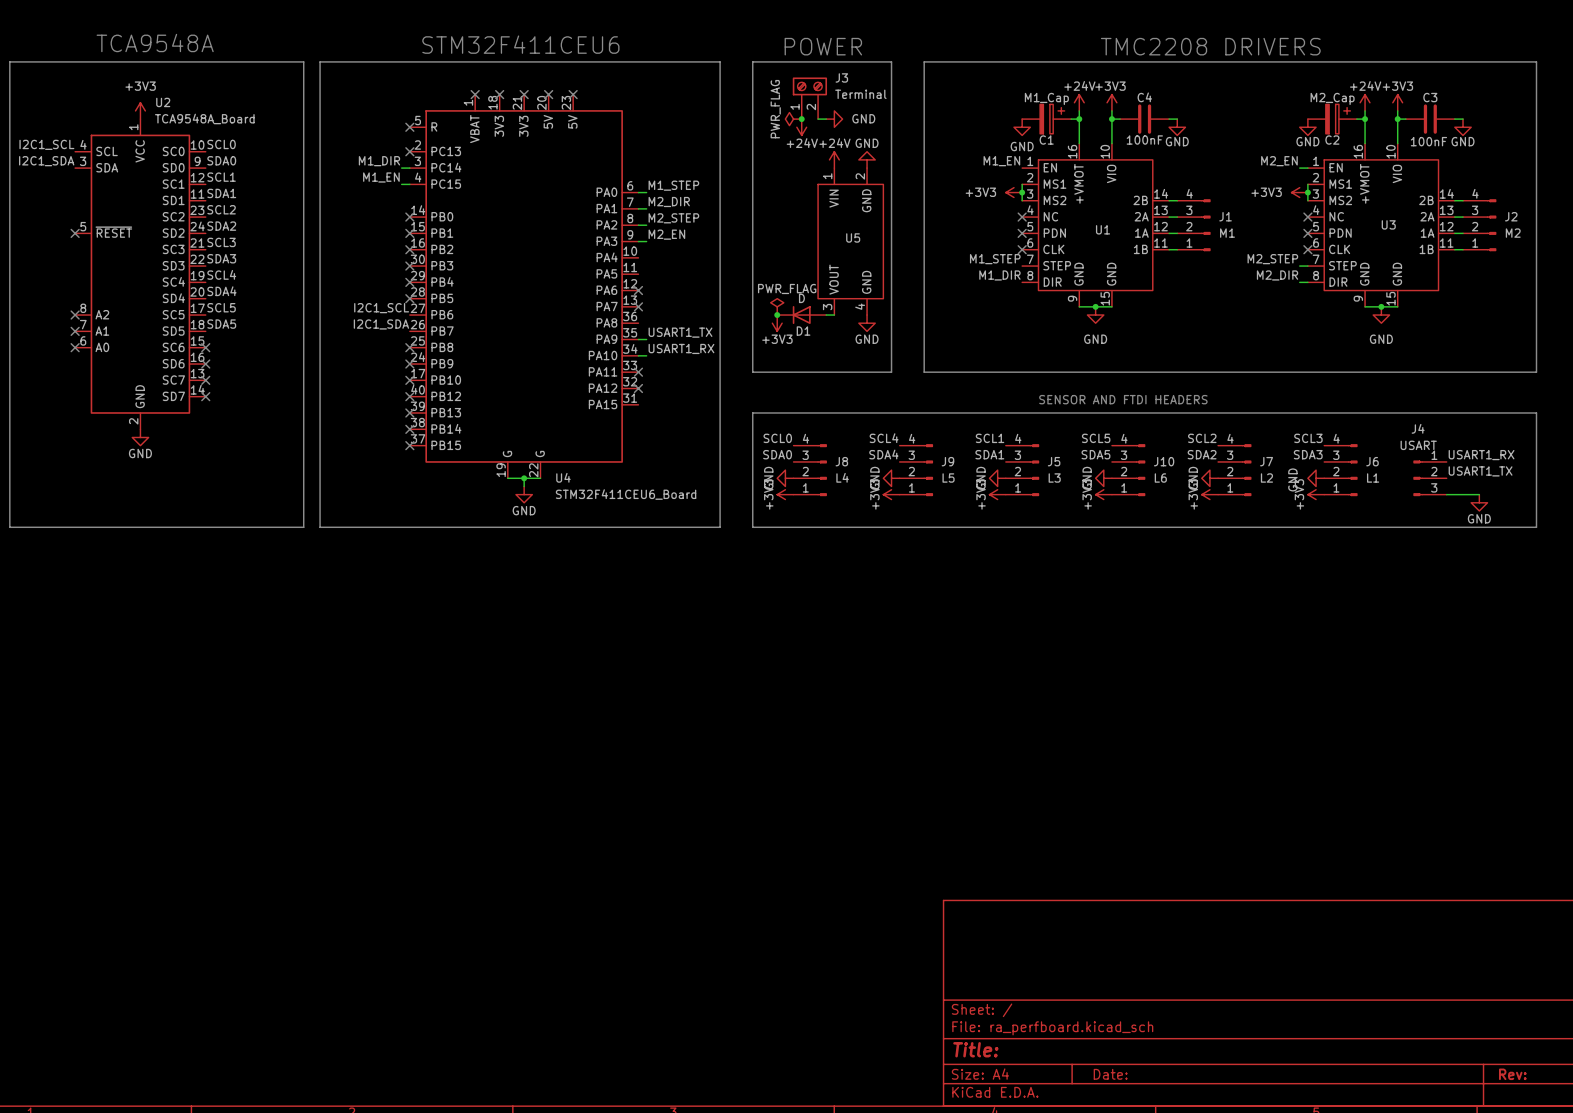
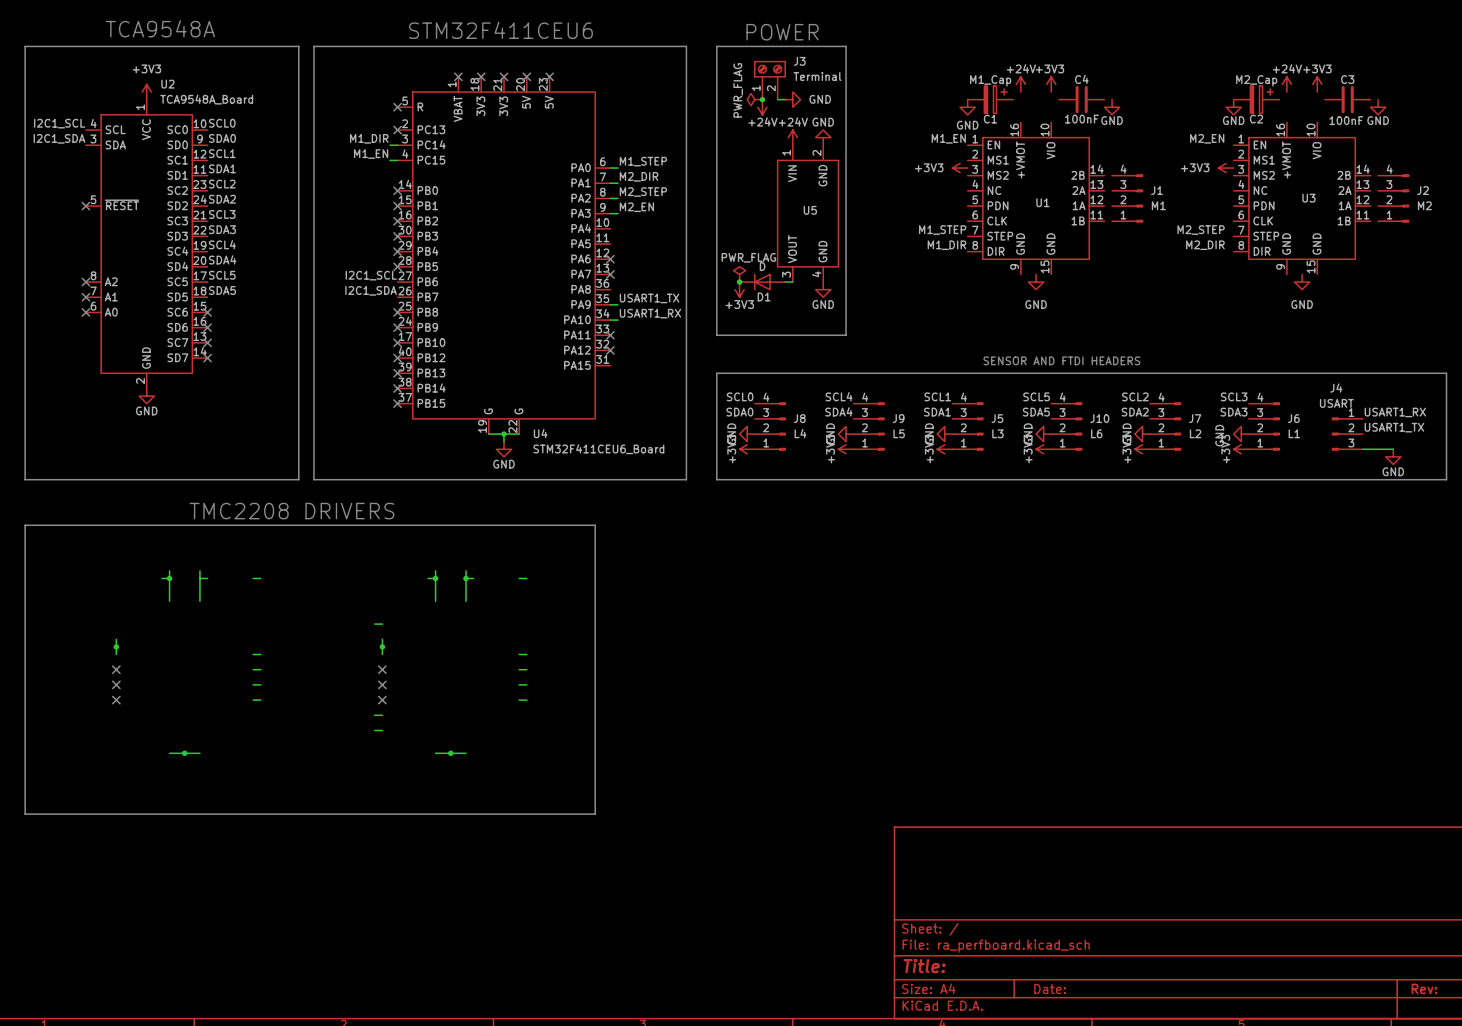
text: TMC2208 DRIVERS (1210, 46) -> none
line: (924, 61) (1536, 61) (1536, 372) (924, 372) (924, 61) -> none
wire: (1079, 110) (1079, 143) -> none
wire: (1111, 110) (1111, 143) -> none
wire: (1365, 110) (1365, 143) -> none
wire: (1397, 110) (1397, 143) -> none
wire: (1071, 119) (1079, 119) -> none
junction: (1079, 119) -> none
wire: (1111, 119) (1120, 119) -> none
junction: (1111, 119) -> none
wire: (1169, 119) (1177, 119) -> none
wire: (1356, 119) (1365, 119) -> none
junction: (1365, 119) -> none
wire: (1397, 119) (1405, 119) -> none
junction: (1397, 119) -> none
wire: (1454, 119) (1463, 119) -> none
wire: (1299, 168) (1307, 168) -> none
wire: (1022, 184) (1022, 200) -> none
wire: (1307, 184) (1307, 200) -> none
junction: (1022, 192) -> none
junction: (1307, 192) -> none
wire: (1169, 200) (1177, 200) -> none
wire: (1454, 200) (1463, 200) -> none
no-connect mark: (1022, 217) -> none
wire: (1169, 217) (1177, 217) -> none
no-connect mark: (1307, 217) -> none
wire: (1454, 217) (1463, 217) -> none
no-connect mark: (1022, 233) -> none
wire: (1169, 233) (1177, 233) -> none
no-connect mark: (1307, 233) -> none
wire: (1454, 233) (1463, 233) -> none
no-connect mark: (1022, 249) -> none
wire: (1169, 249) (1177, 249) -> none
no-connect mark: (1307, 249) -> none
wire: (1454, 249) (1463, 249) -> none
wire: (1299, 266) (1307, 266) -> none
wire: (1299, 282) (1307, 282) -> none
wire: (1079, 306) (1111, 306) -> none
junction: (1095, 306) -> none
wire: (1365, 306) (1397, 306) -> none
junction: (1381, 306) -> none
text: none -> TMC2208 DRIVERS (291, 511)
line: none -> (25, 525) (25, 814) (595, 814) (595, 525) (25, 525)
wire: none -> (169, 570) (169, 601)
wire: none -> (199, 570) (199, 601)
wire: none -> (435, 570) (435, 601)
wire: none -> (465, 570) (465, 601)
wire: none -> (161, 578) (169, 578)
junction: none -> (169, 578)
wire: none -> (199, 578) (207, 578)
wire: none -> (253, 578) (260, 578)
wire: none -> (427, 578) (435, 578)
junction: none -> (435, 578)
wire: none -> (465, 578) (473, 578)
junction: none -> (465, 578)
wire: none -> (519, 578) (526, 578)
wire: none -> (374, 624) (382, 624)
wire: none -> (116, 639) (116, 654)
wire: none -> (382, 639) (382, 654)
junction: none -> (116, 646)
junction: none -> (382, 646)
wire: none -> (253, 654) (260, 654)
wire: none -> (519, 654) (526, 654)
no-connect mark: none -> (116, 669)
wire: none -> (253, 669) (260, 669)
no-connect mark: none -> (382, 669)
wire: none -> (519, 669) (526, 669)
no-connect mark: none -> (116, 684)
wire: none -> (253, 684) (260, 684)
no-connect mark: none -> (382, 684)
wire: none -> (519, 684) (526, 684)
no-connect mark: none -> (116, 700)
wire: none -> (253, 700) (260, 700)
no-connect mark: none -> (382, 700)
wire: none -> (519, 700) (526, 700)
wire: none -> (374, 715) (382, 715)
wire: none -> (374, 730) (382, 730)
wire: none -> (169, 753) (199, 753)
junction: none -> (184, 753)
wire: none -> (435, 753) (465, 753)
junction: none -> (450, 753)

